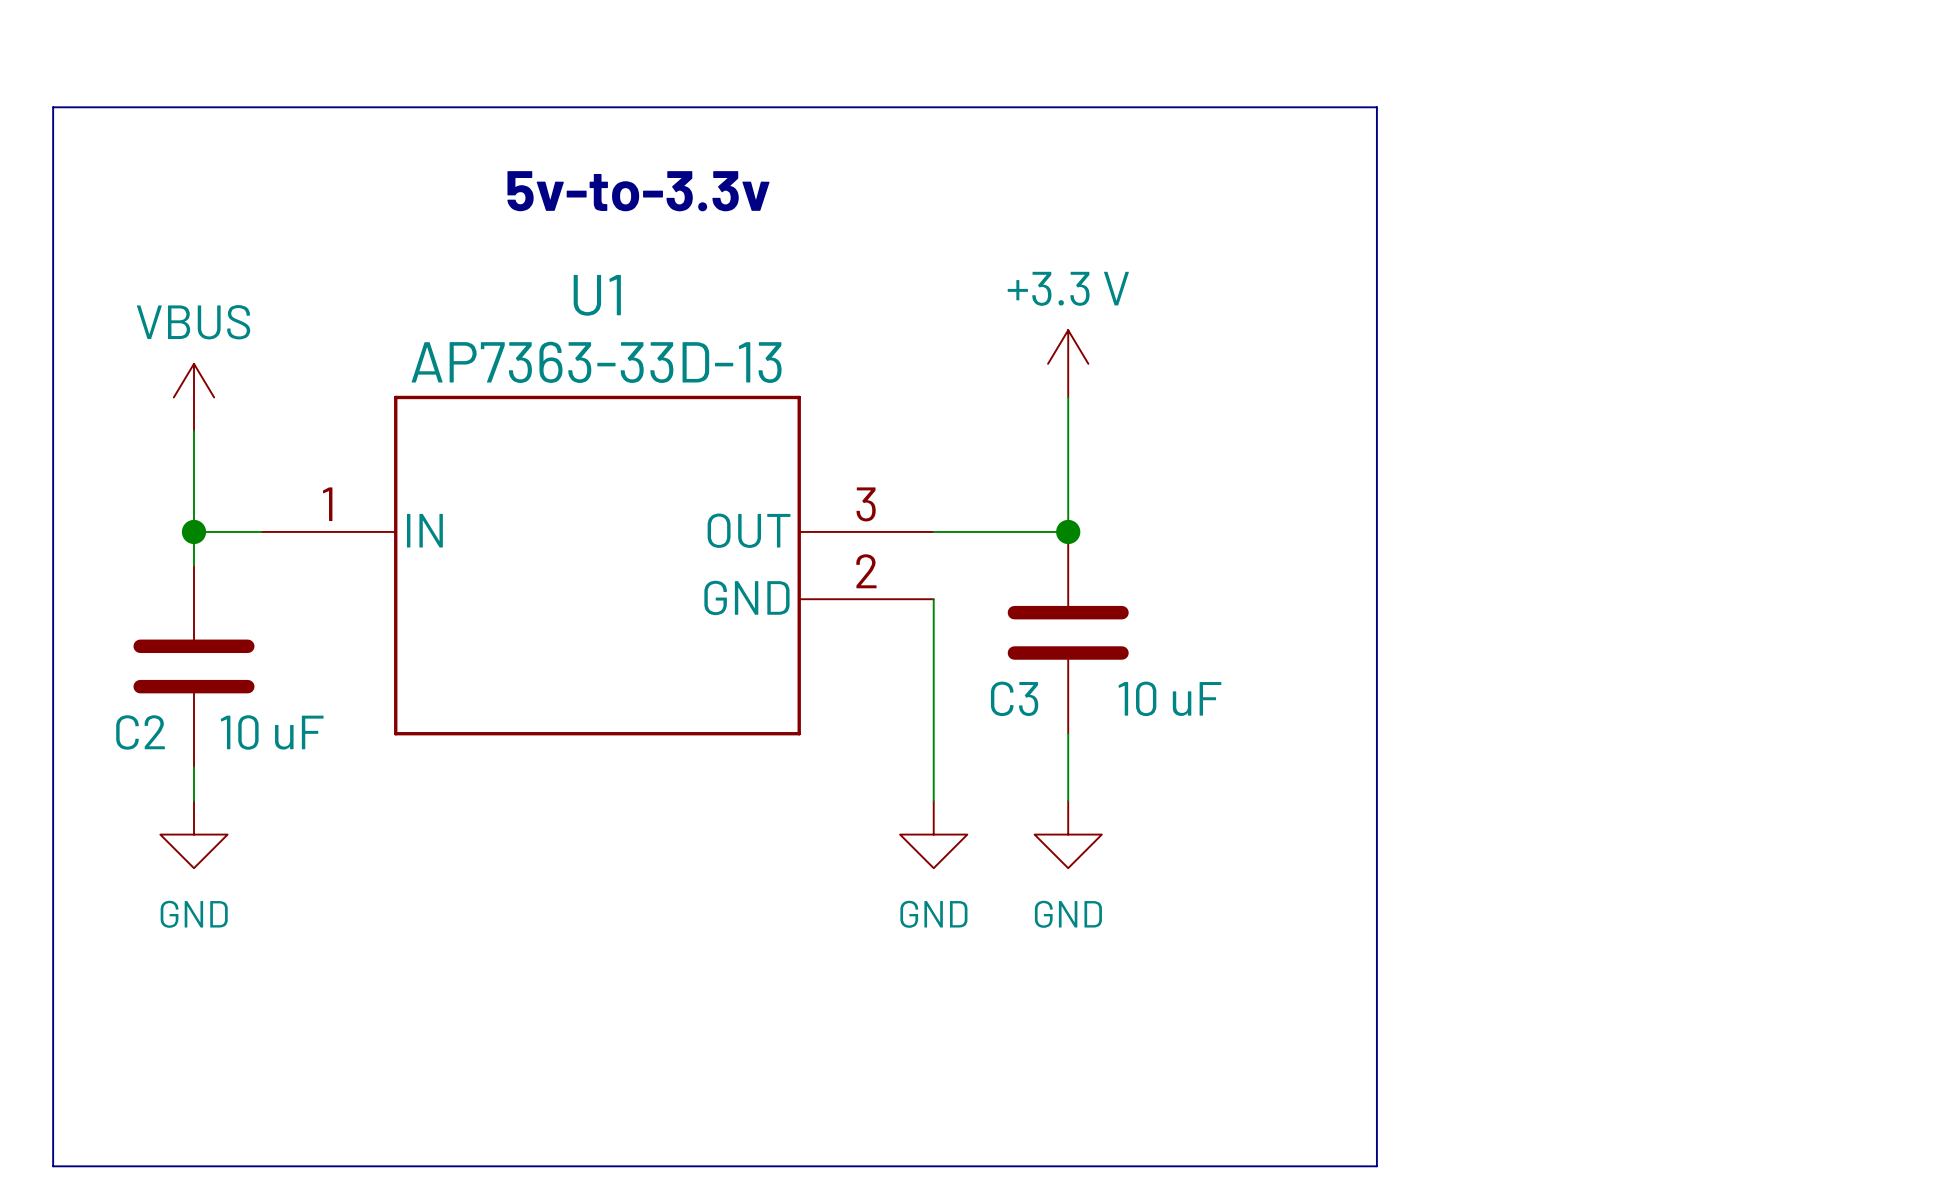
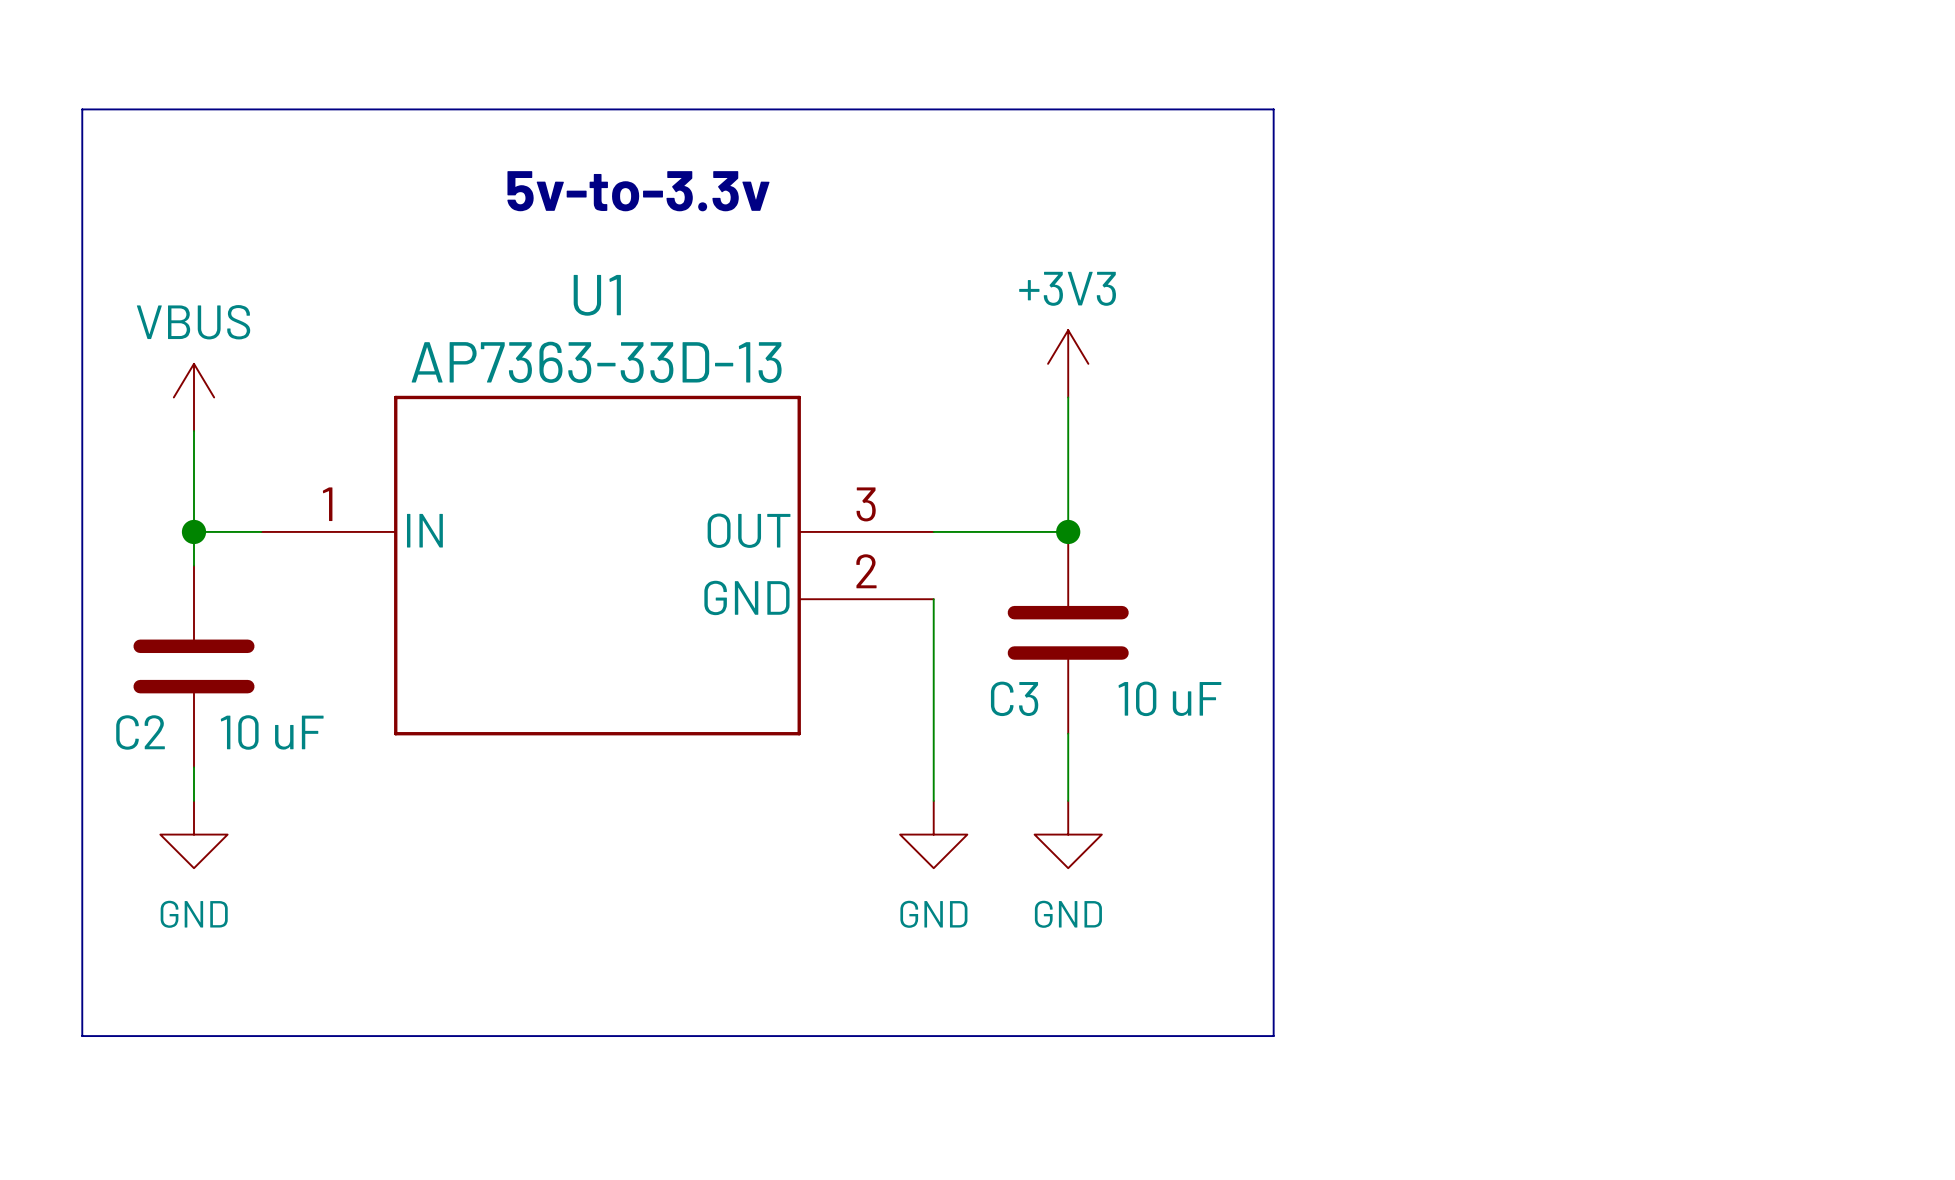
line: (53, 107) (1376, 107) (1376, 1166) (53, 1166) (53, 107) -> (82, 109) (82, 1036) (1273, 1036) (1273, 109) (82, 109)
power symbol: +3.3 V (1068, 363) -> +3V3 (1068, 363)

